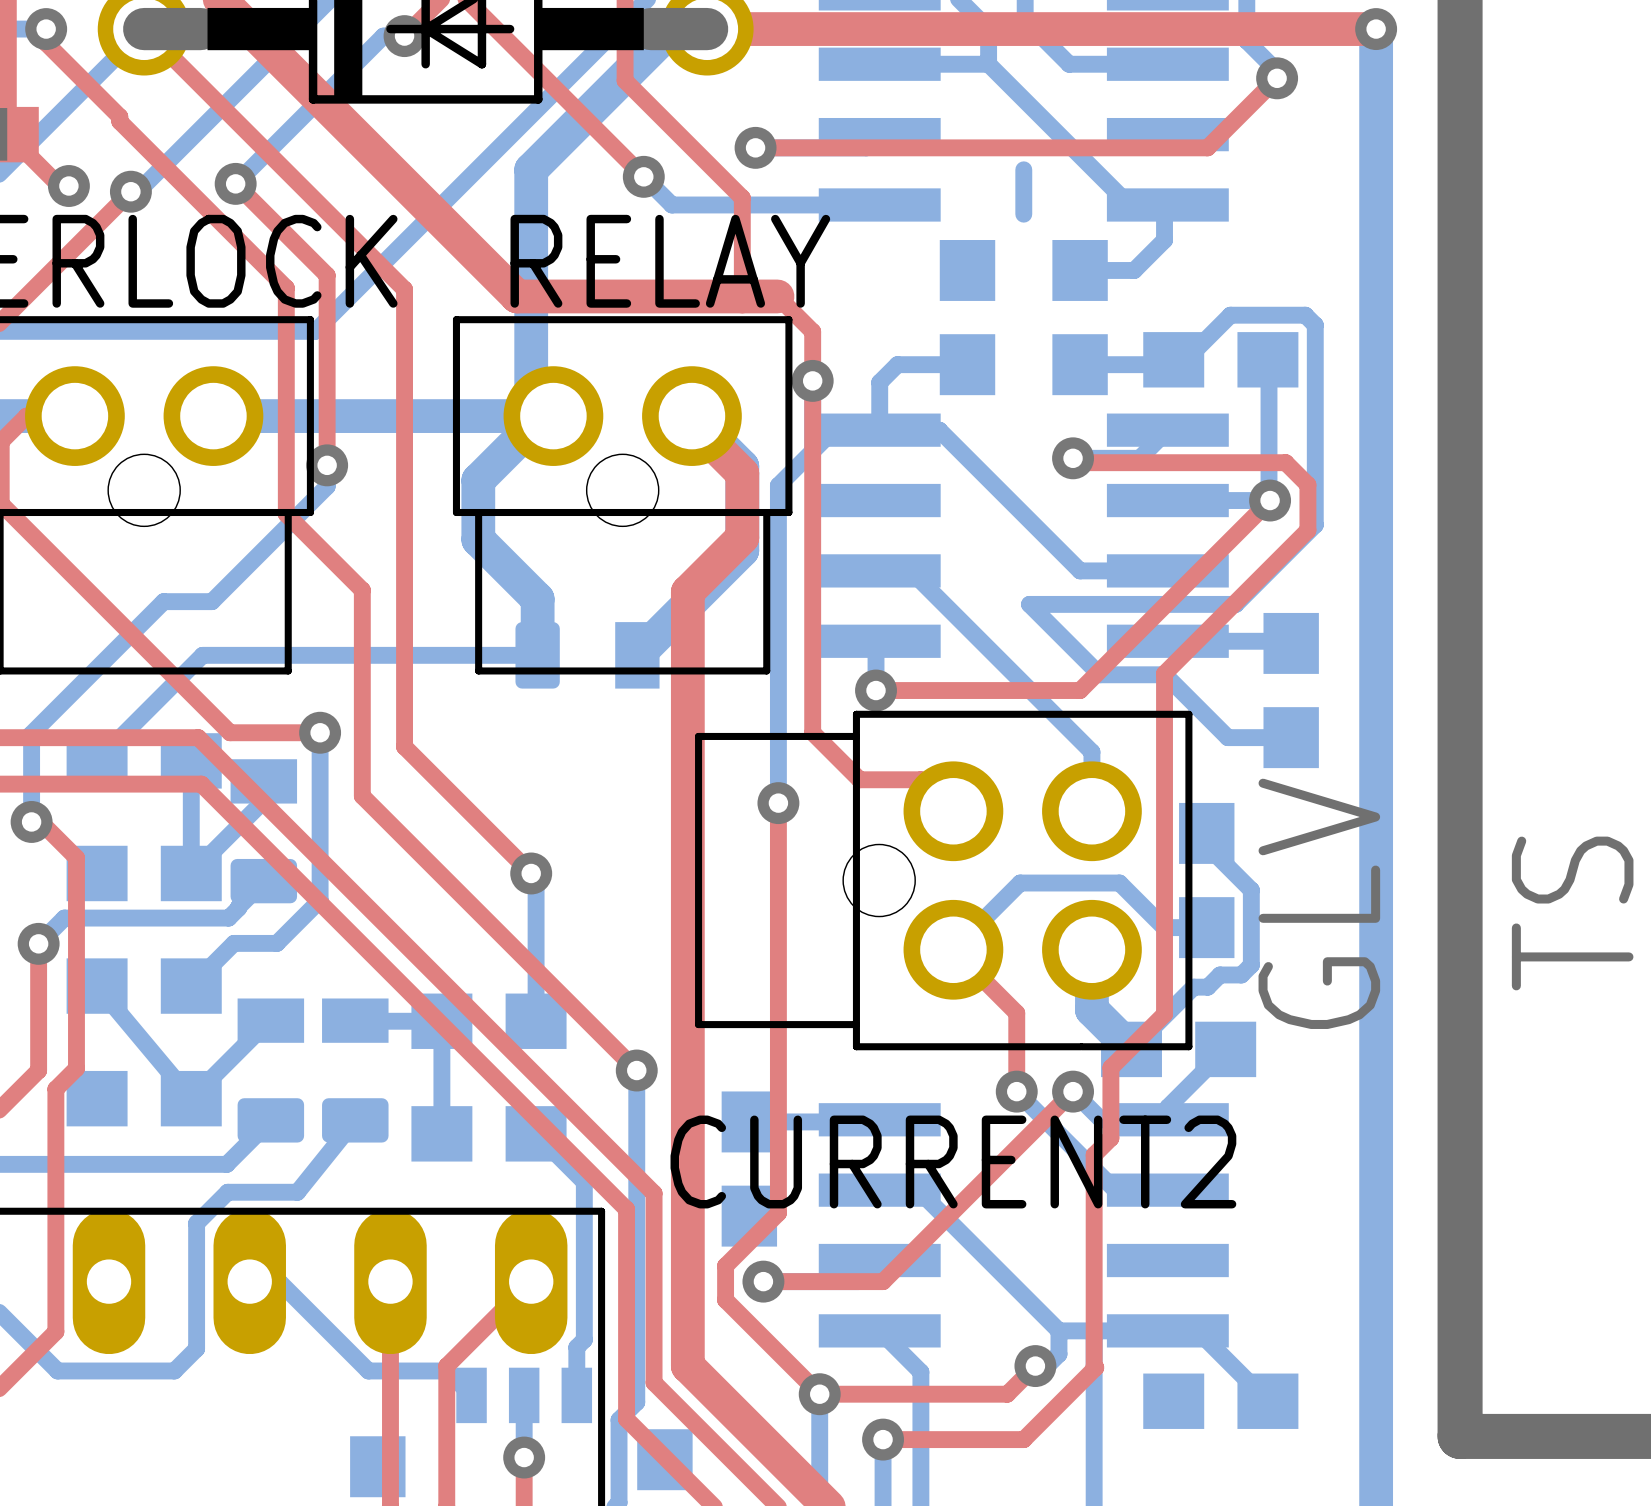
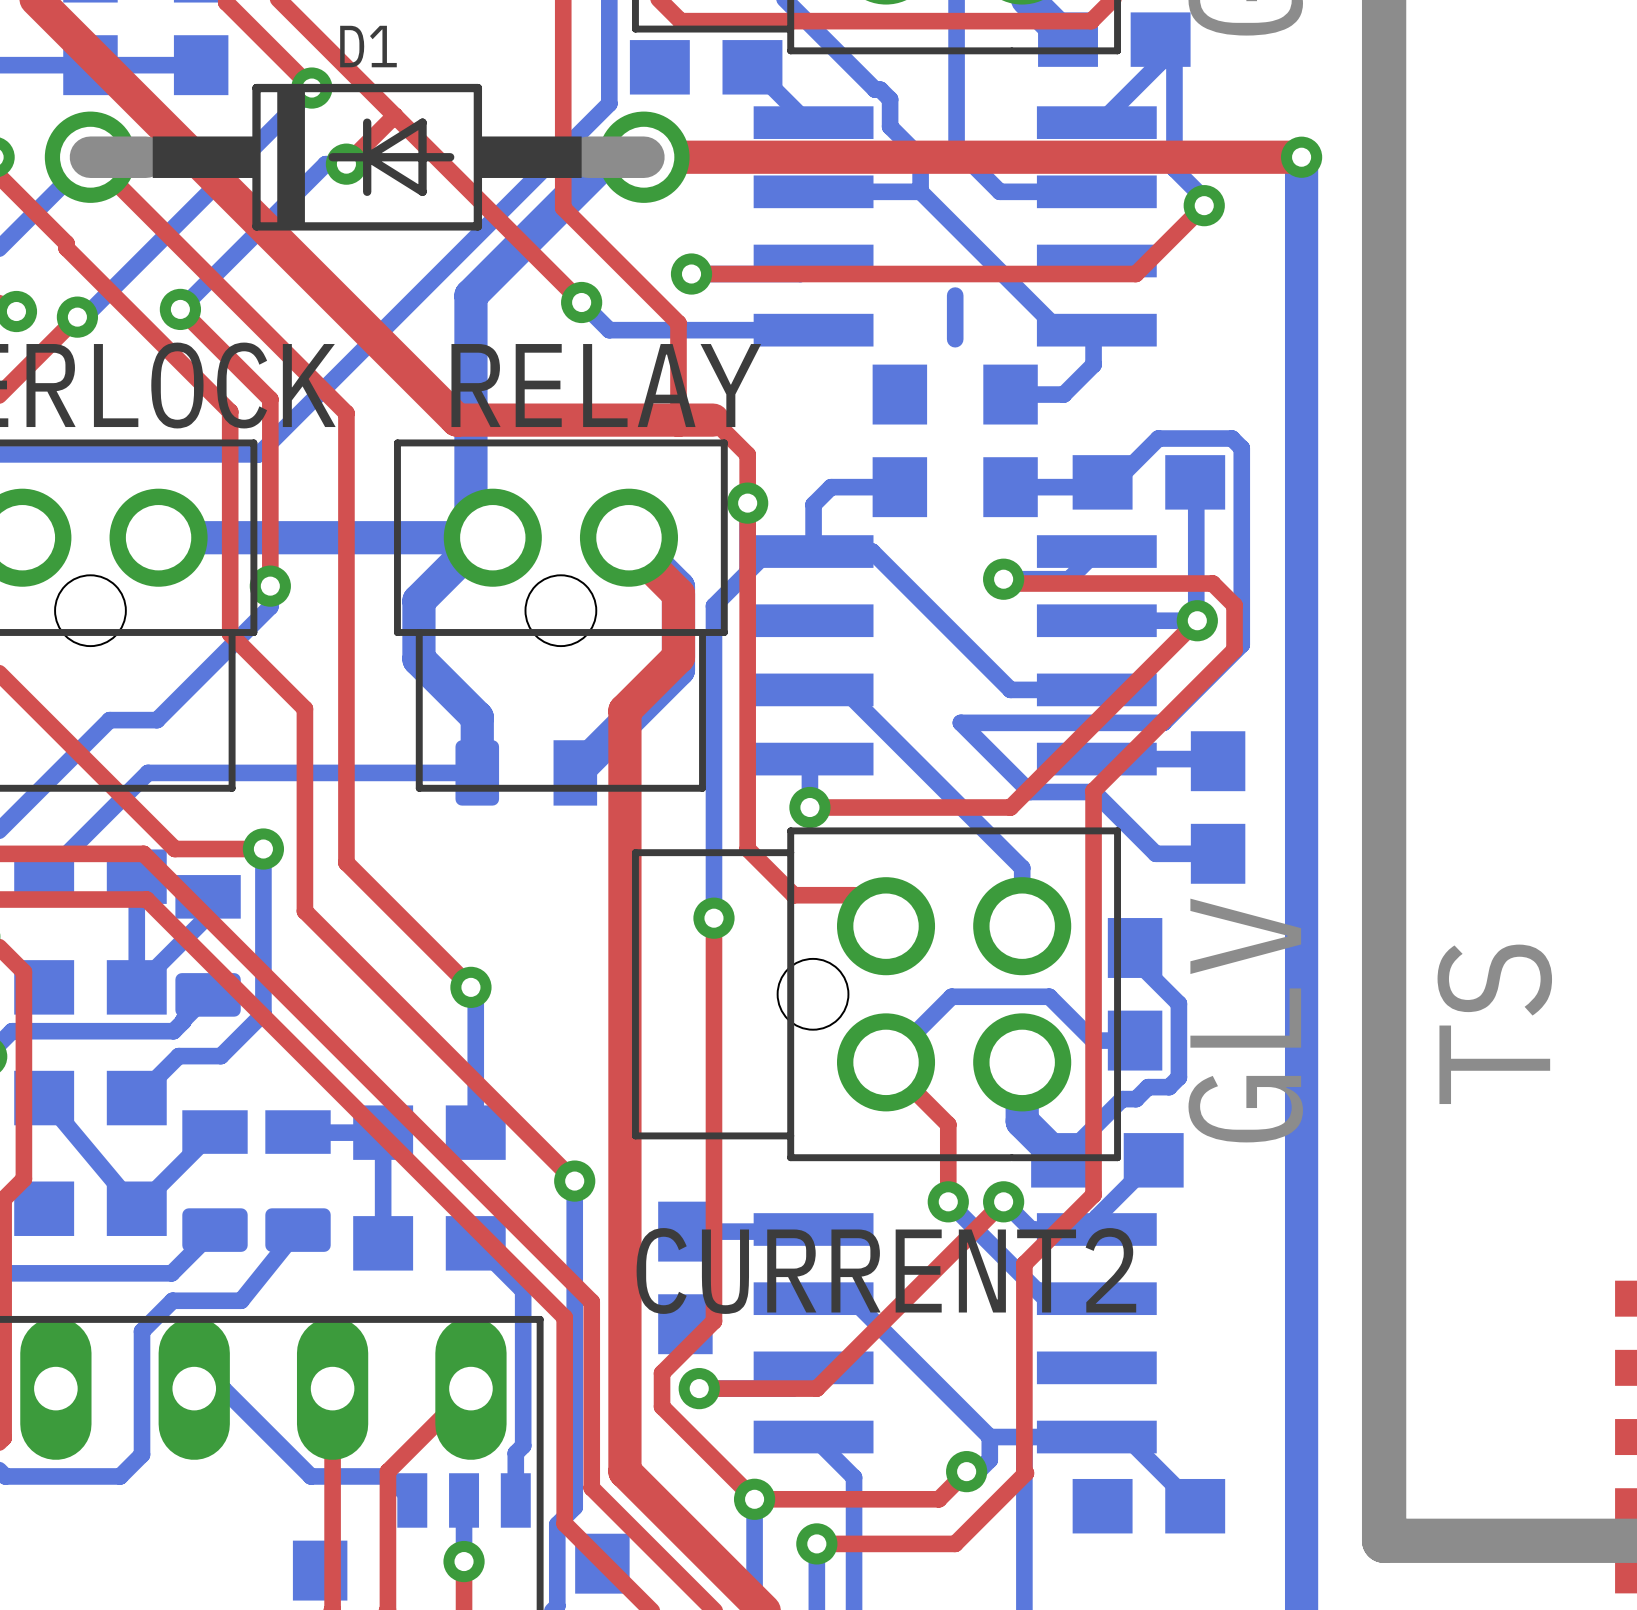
top track: (1164, 1014) (1110, 1067) (1110, 1138) -> (1093, 1125) (1093, 1194) (1040, 1247)

